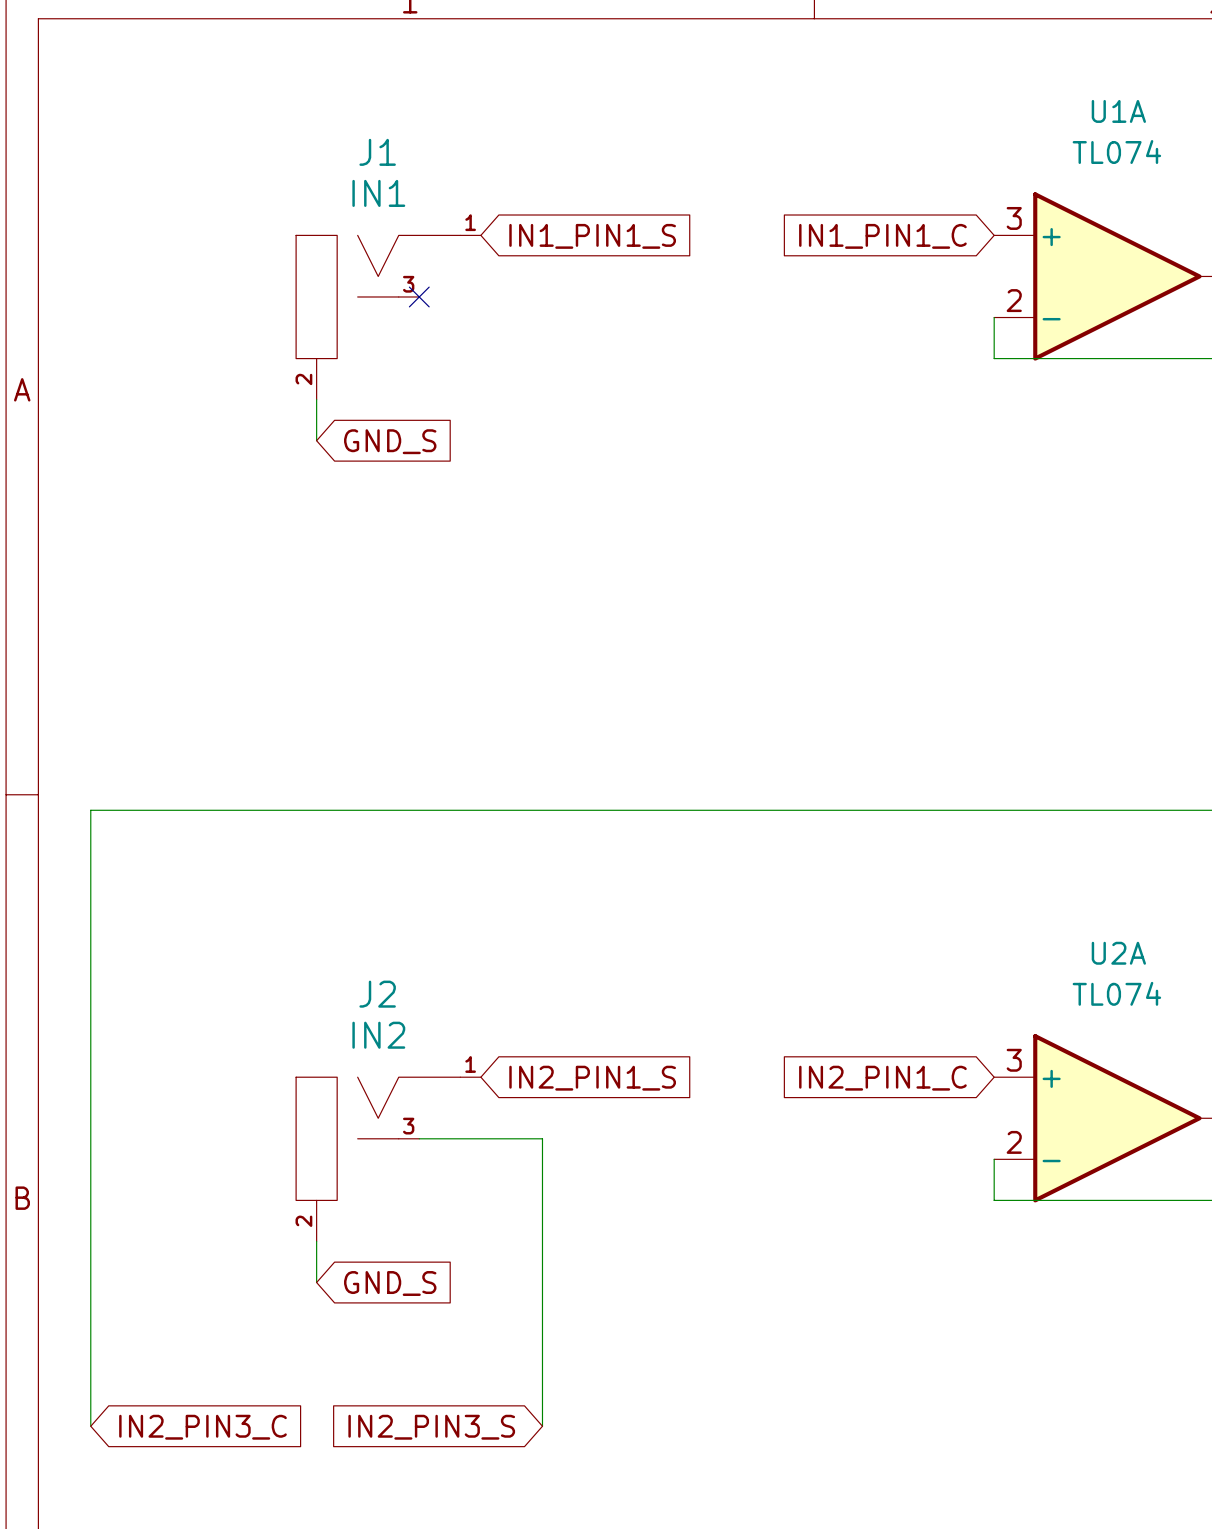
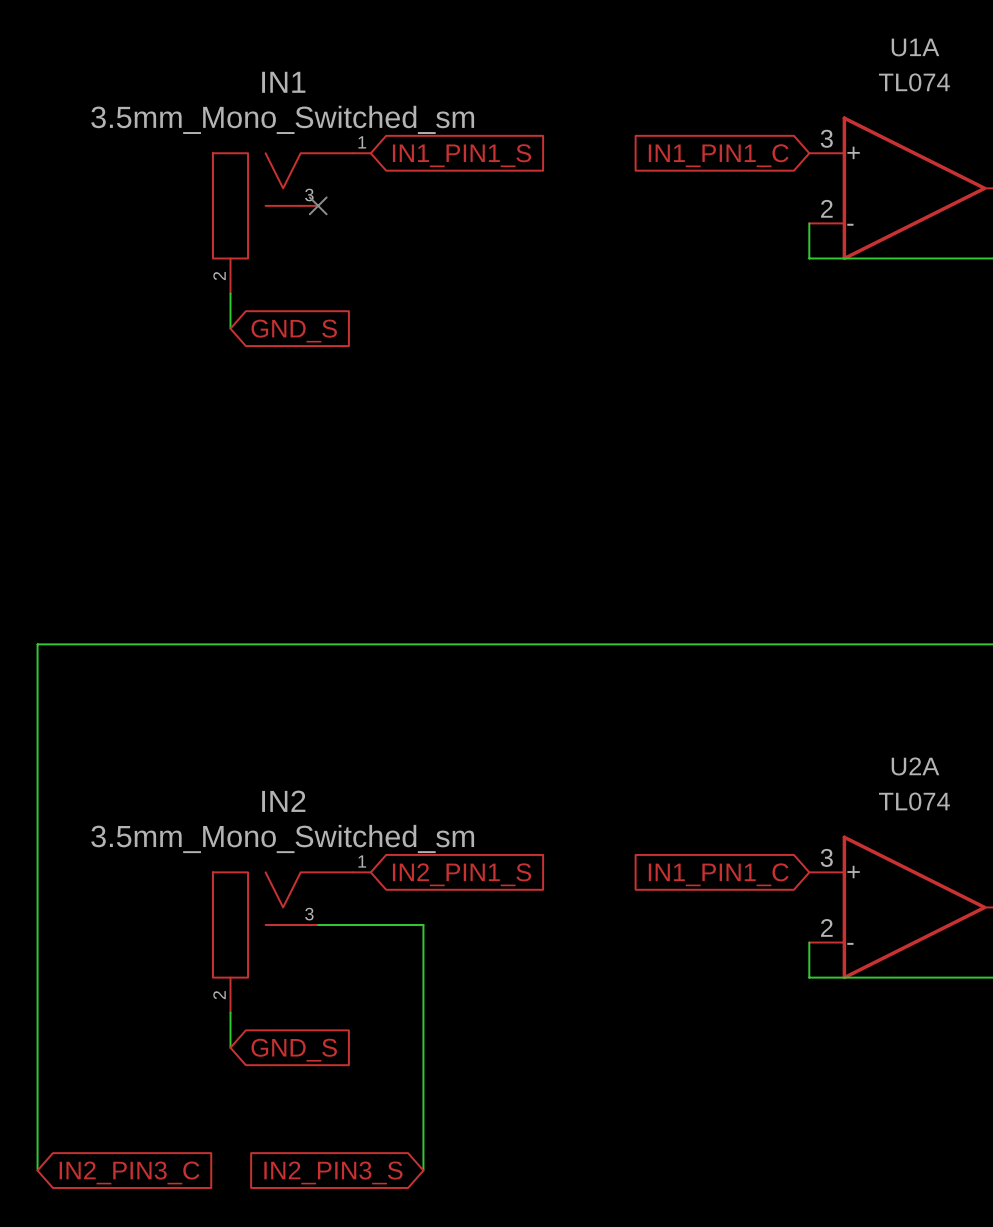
J1 name: J1 (377, 152) -> IN1 (283, 82)
J1 value: IN1 (378, 193) -> 3.5mm_Mono_Switched_sm (282, 119)
J2 name: J2 (377, 994) -> IN2 (283, 801)
J2 value: IN2 (378, 1035) -> 3.5mm_Mono_Switched_sm (282, 838)
global label: IN2_PIN1_C (882, 1078) -> IN1_PIN1_C (718, 874)

